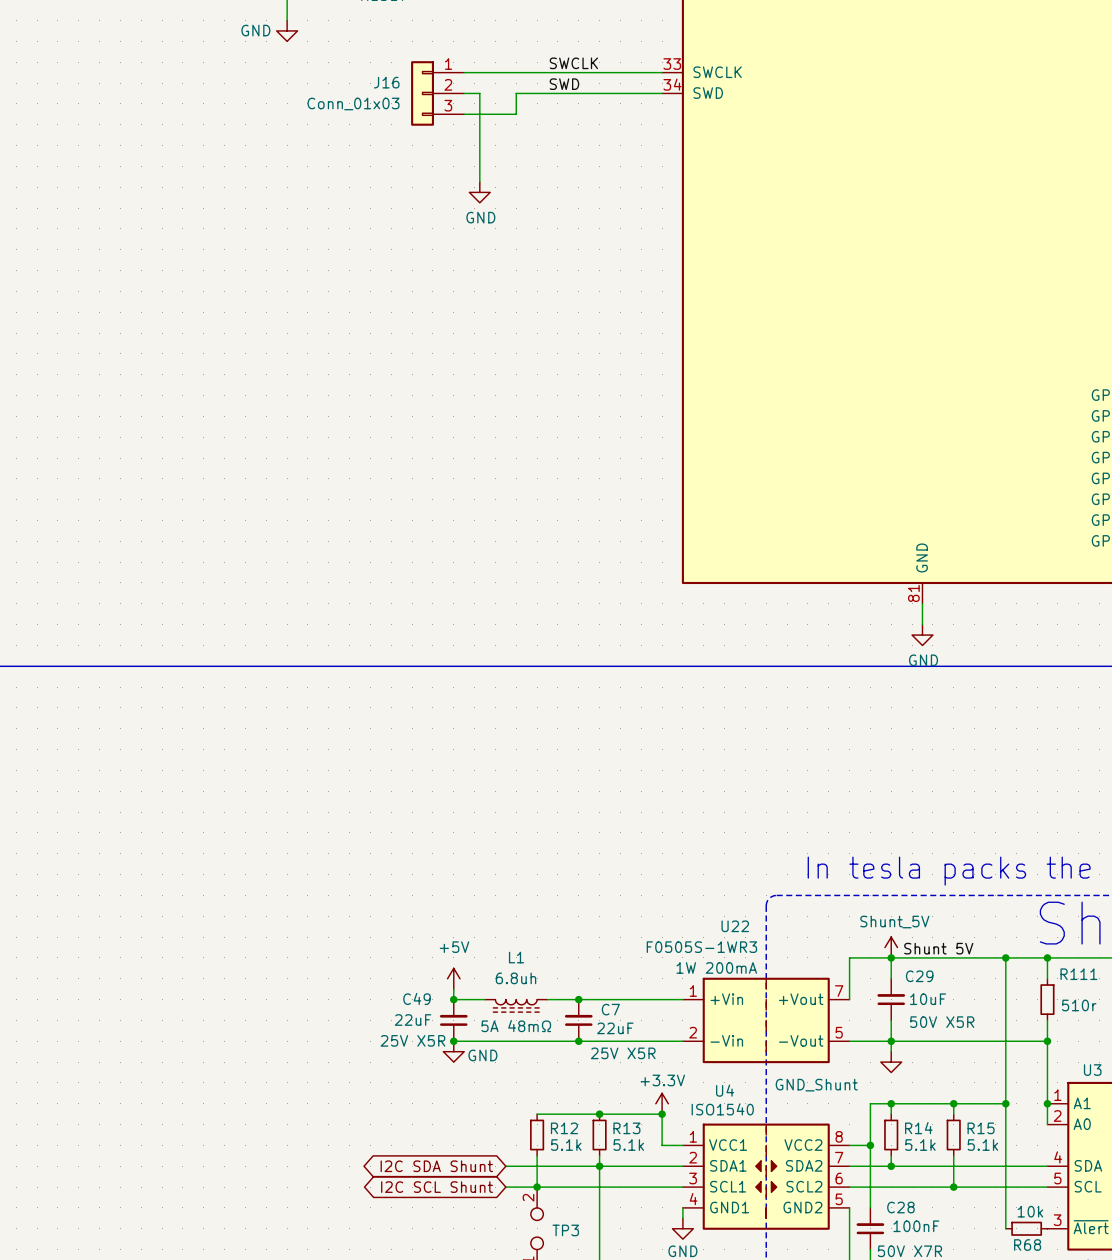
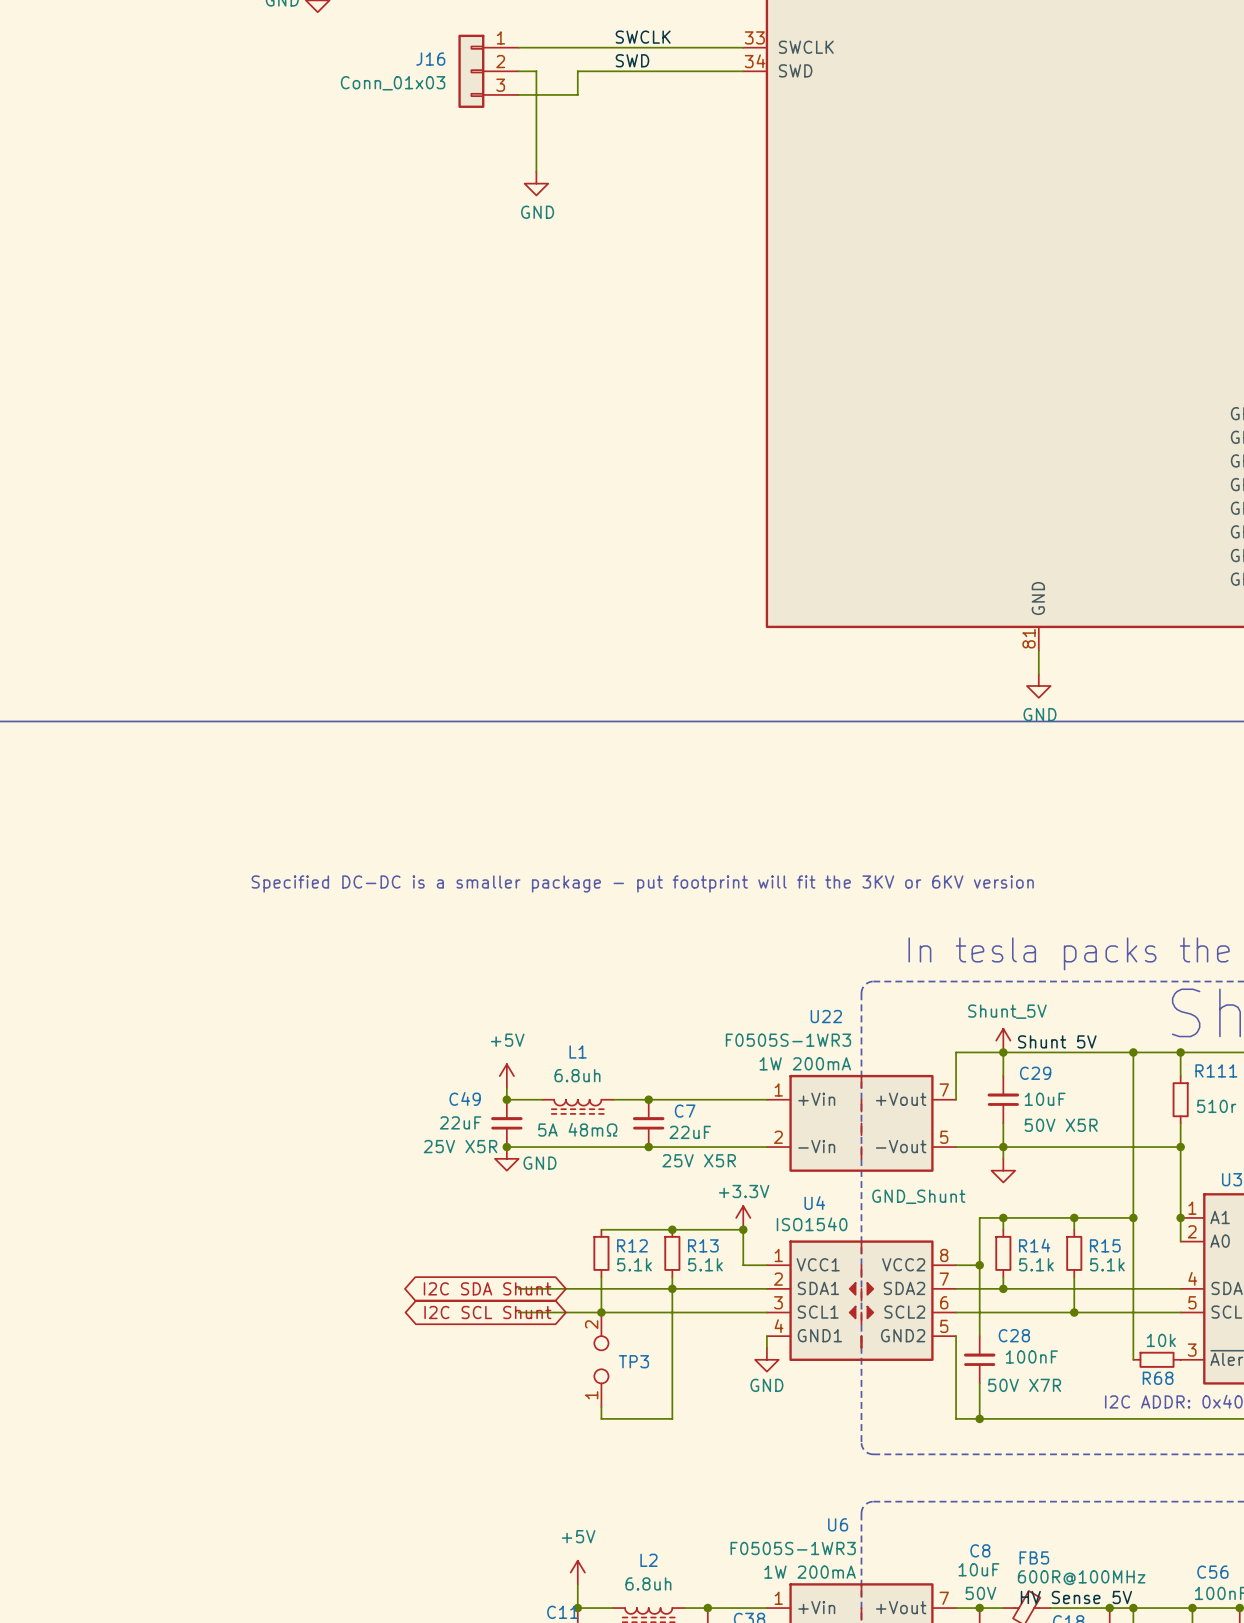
text: none -> Specified DC-DC is a smaller package - put footprint will fit the 3KV or 6KV version (642, 883)
wire: none -> (518, 1288) (565, 1288)
wire: none -> (518, 1312) (565, 1312)

